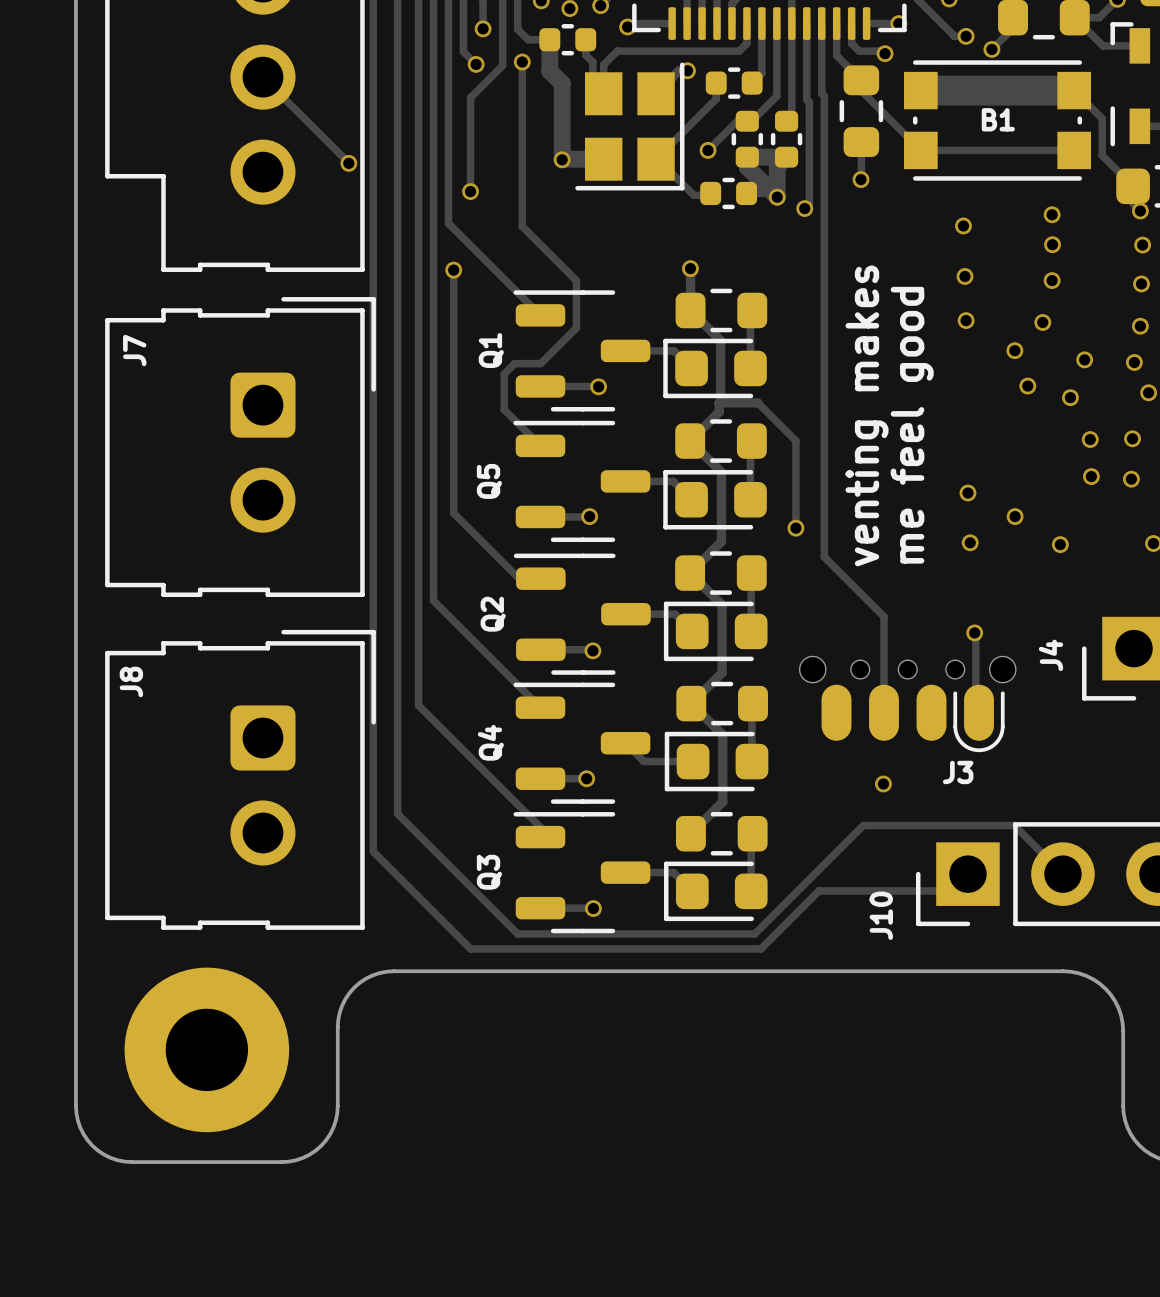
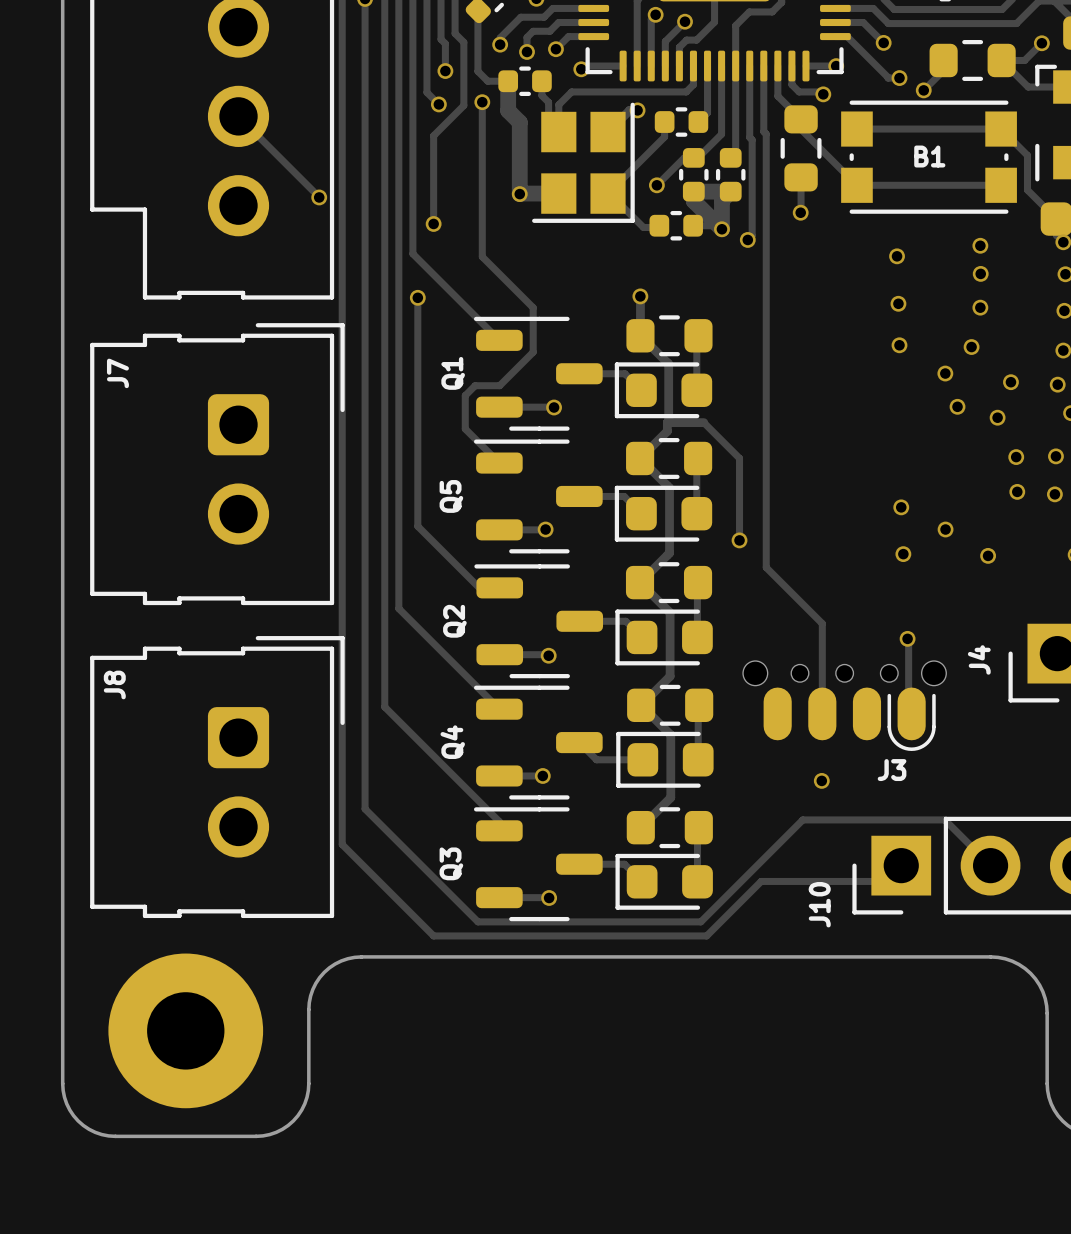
track width: thick (920, 90) (1074, 90) -> thin (856, 129) (1001, 129)
text: venting makes (867, 415) -> none
text: me feel good (912, 425) -> none

